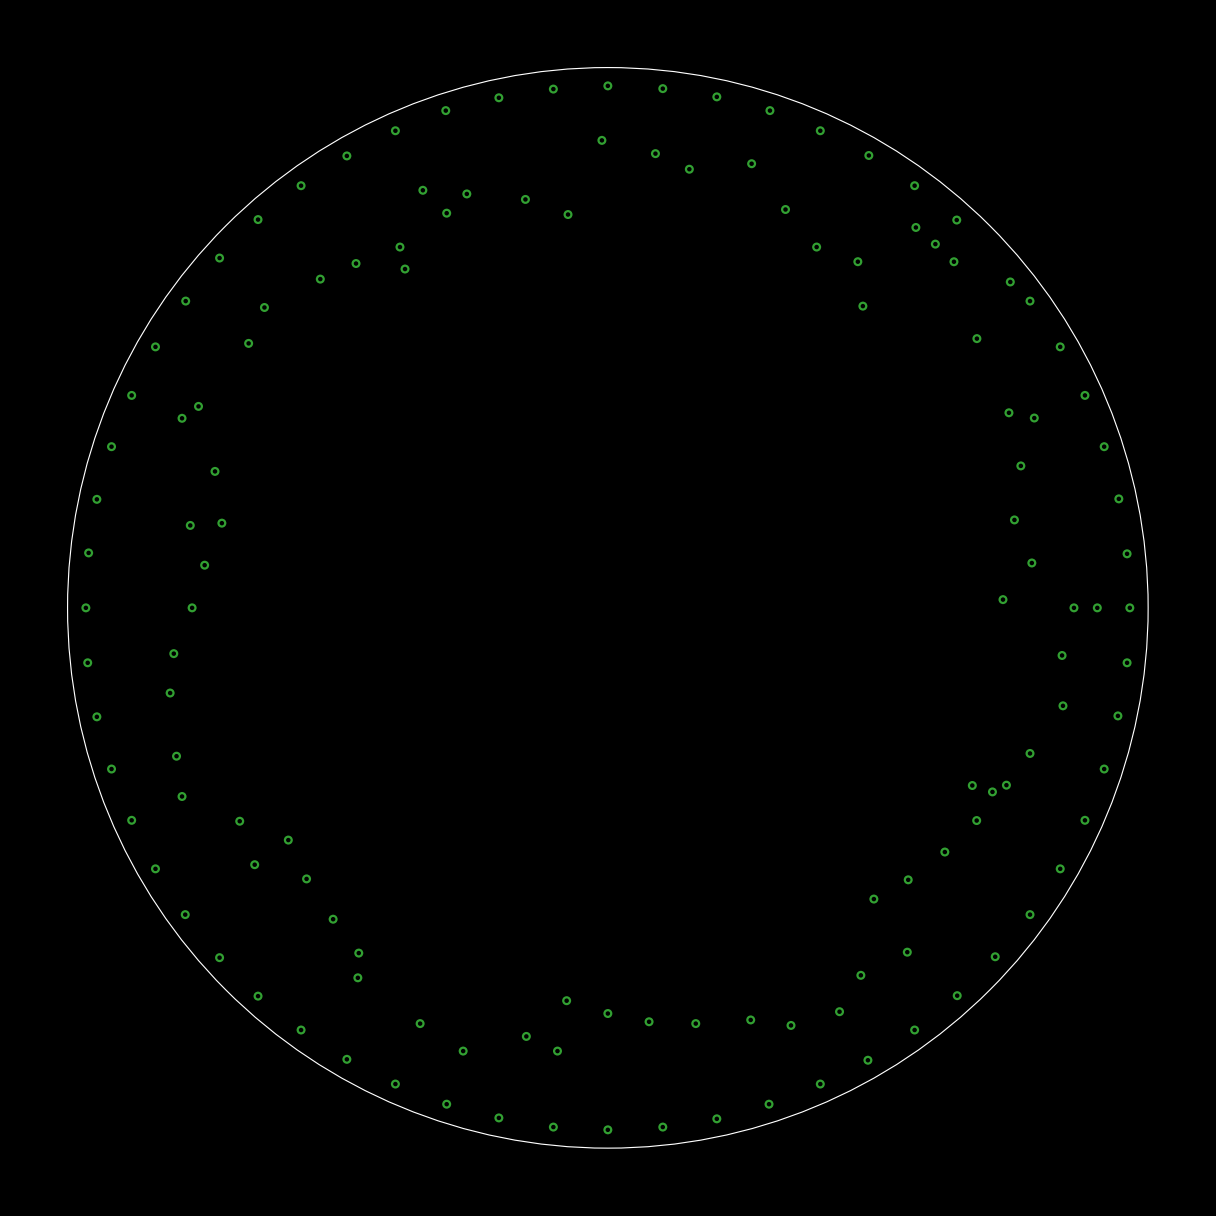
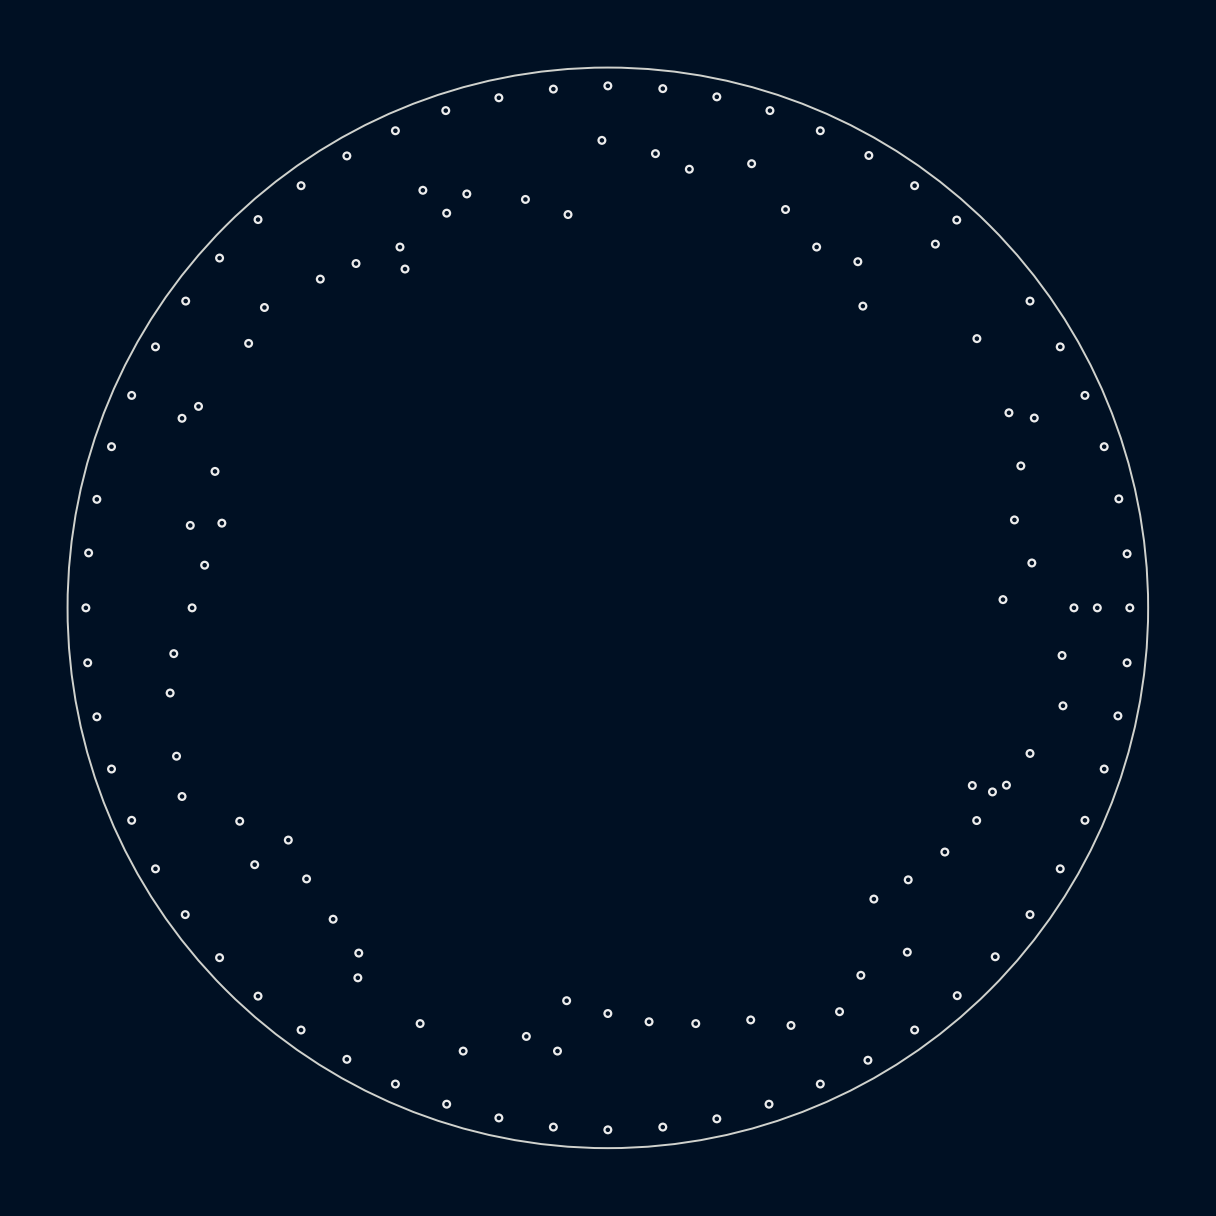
via: (915, 227) -> none
via: (953, 261) -> none
via: (1010, 281) -> none

